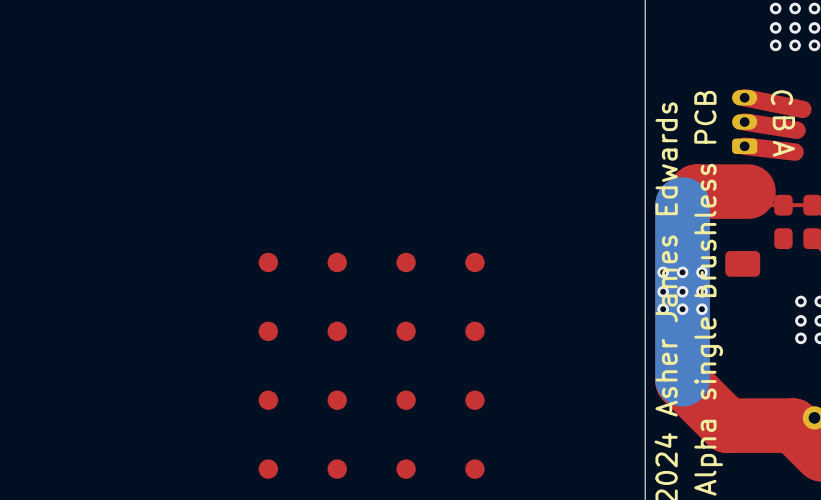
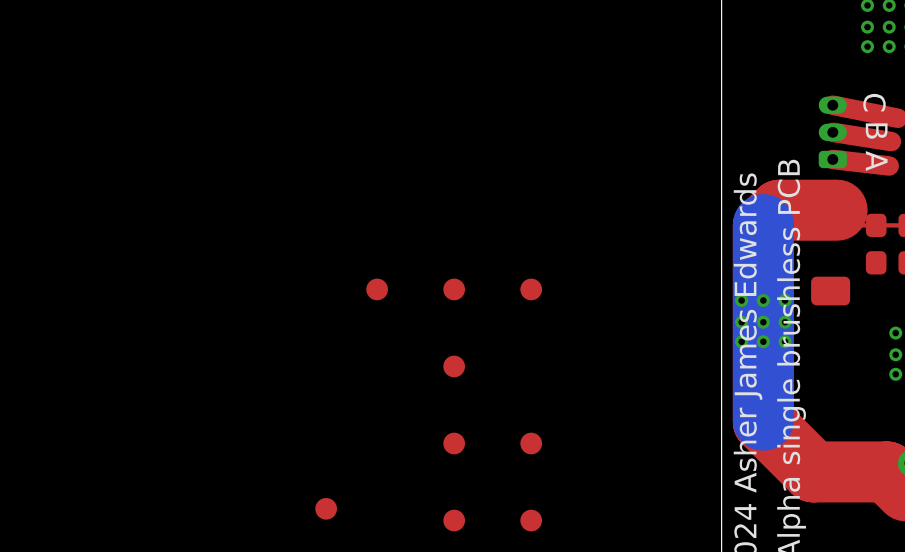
part: (268, 262) -> none
part: (268, 331) -> none
part: (337, 331) -> none
part: (474, 331) -> none
part: (268, 400) -> none
part: (337, 400) -> none
part: none -> (326, 508)
part: (268, 469) -> none
part: (337, 469) -> none

